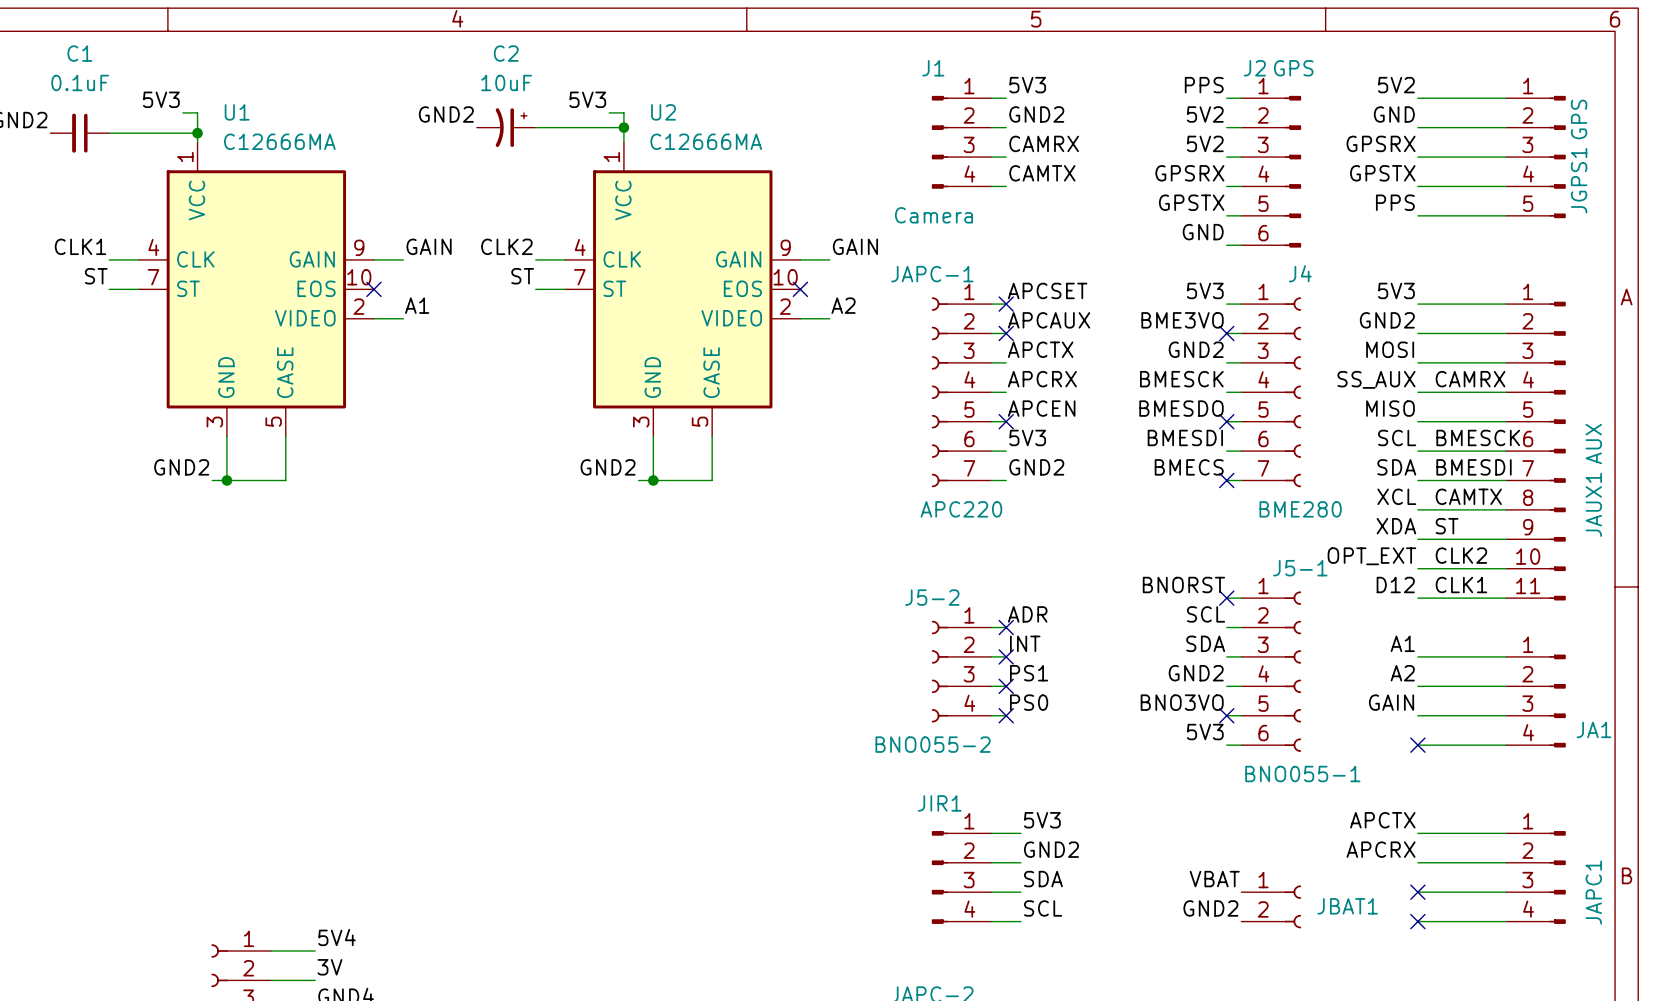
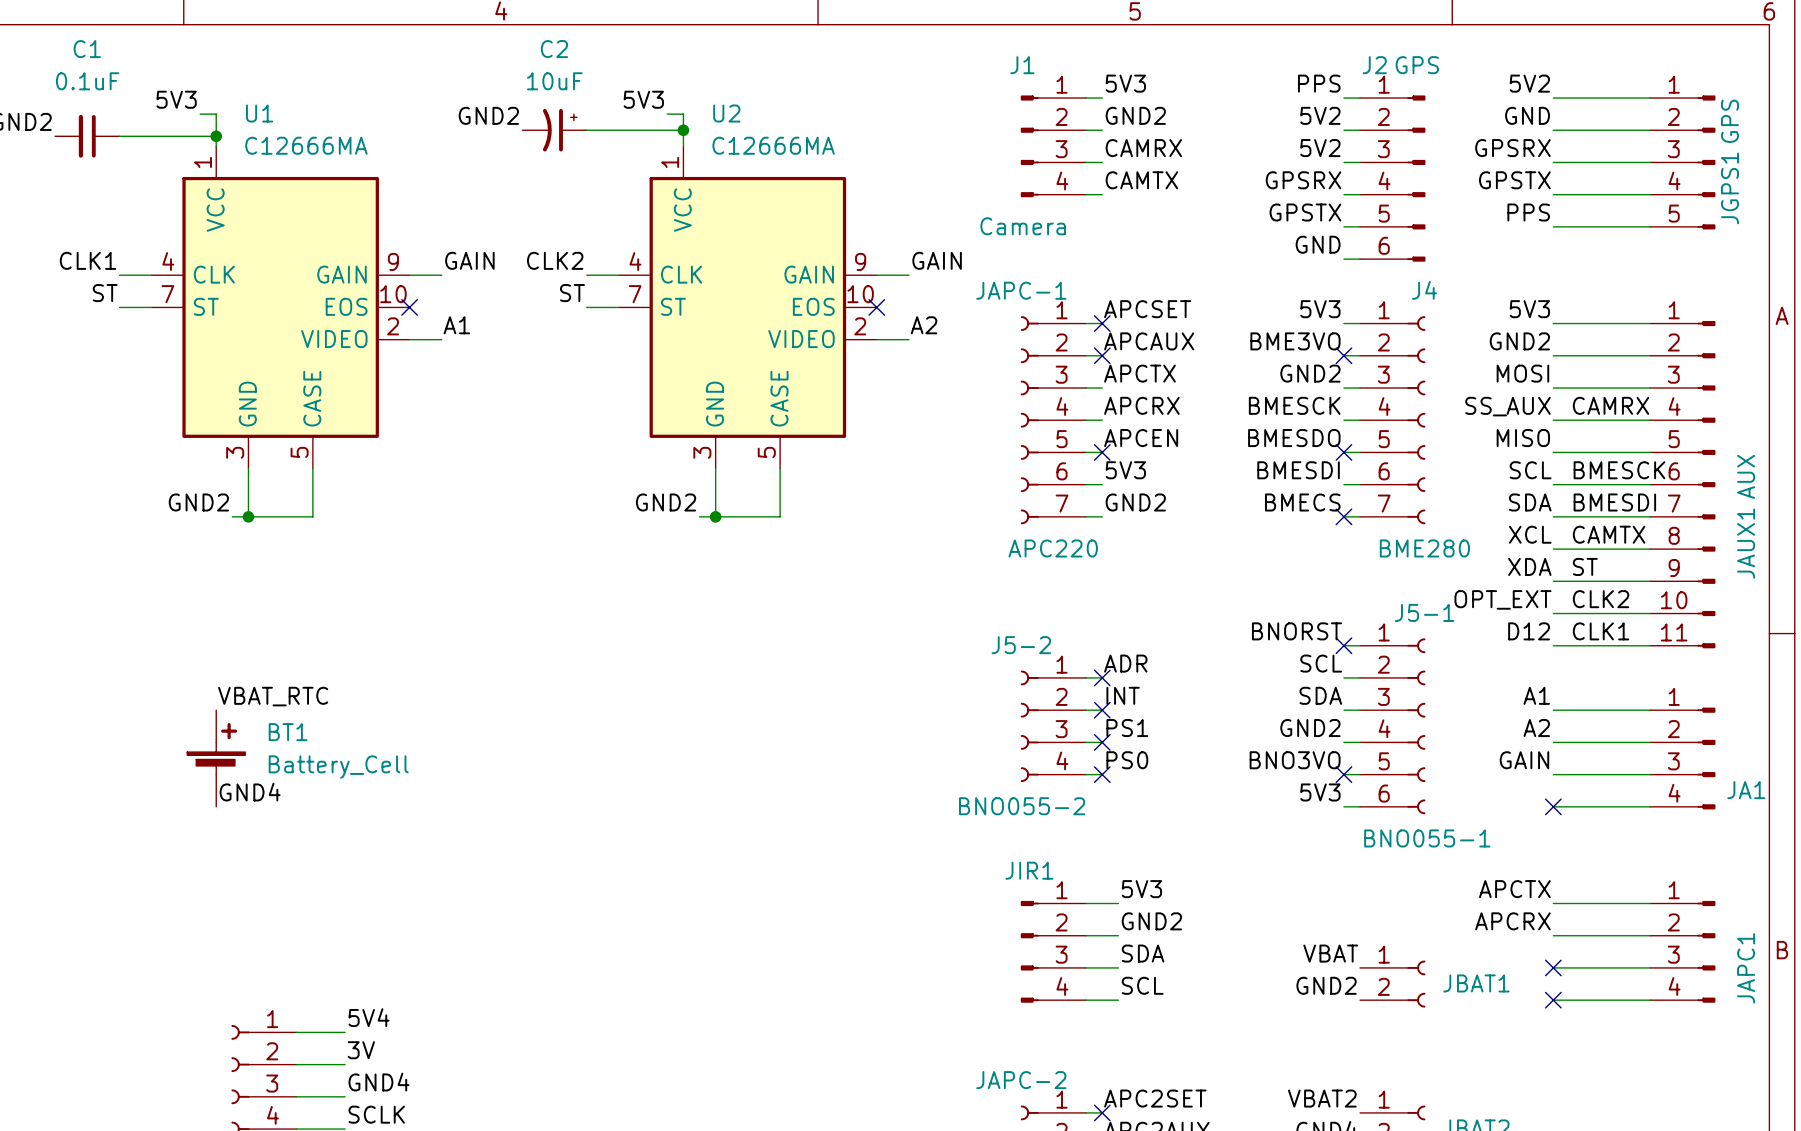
label: none -> VBAT_RTC (273, 696)
BT1: none -> Battery_Cell (216, 758)
label: none -> GND4 (250, 792)

